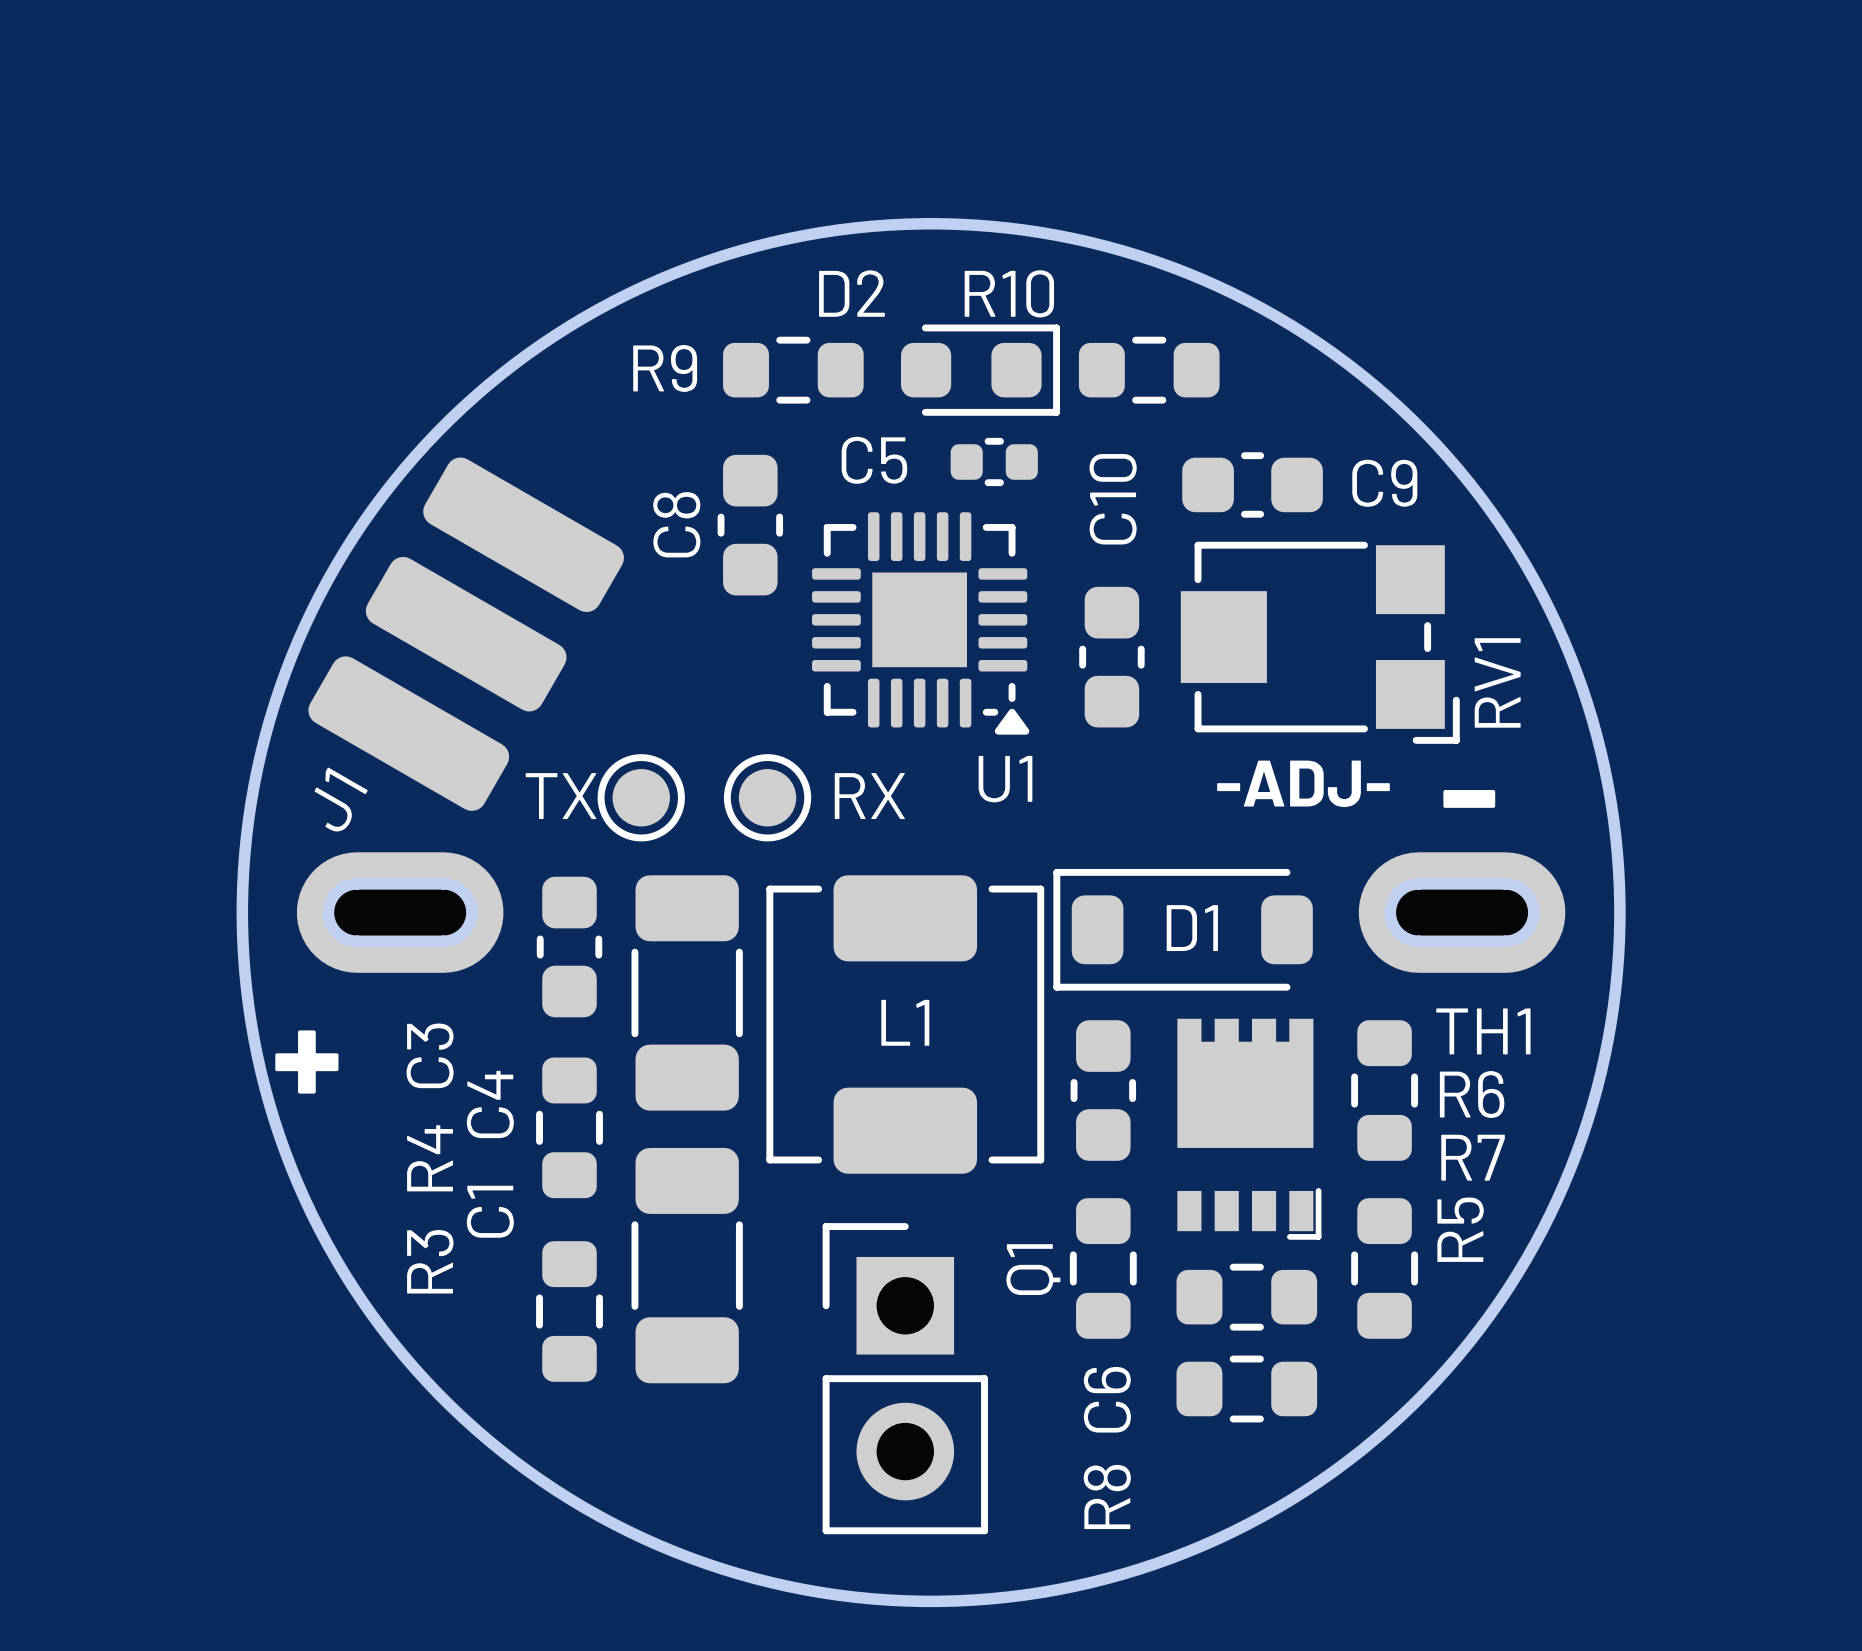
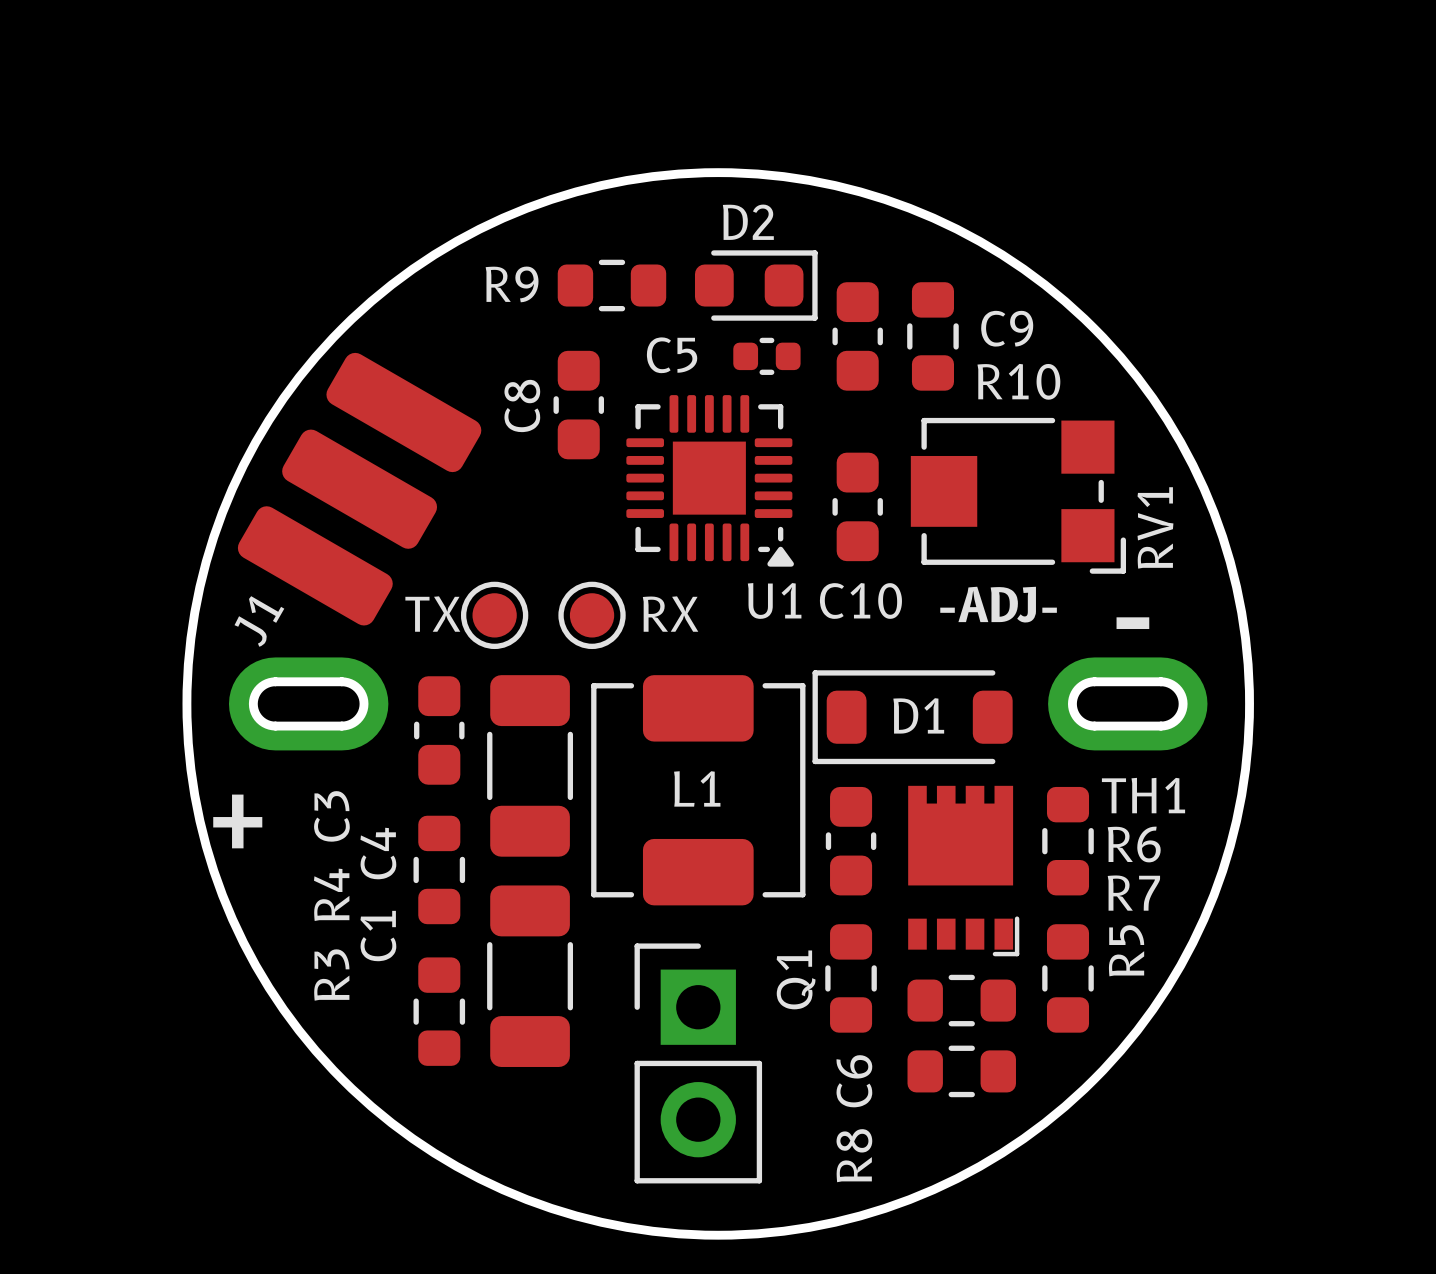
D2 name position: D2 (851, 293) -> D2 (748, 222)
R10 name position: R10 (1009, 293) -> R10 (1018, 381)
R10 rotation: 0° (1149, 370) -> 90° clockwise (932, 336)
R10 position: (1149, 370) -> (932, 336)
C9 rotation: 0° (1252, 484) -> 90° clockwise (857, 336)
C9 position: (1252, 484) -> (857, 336)
C10 name rotation: 0° (1113, 499) -> 90° clockwise (860, 600)
C10 name position: C10 (1113, 499) -> C10 (860, 600)

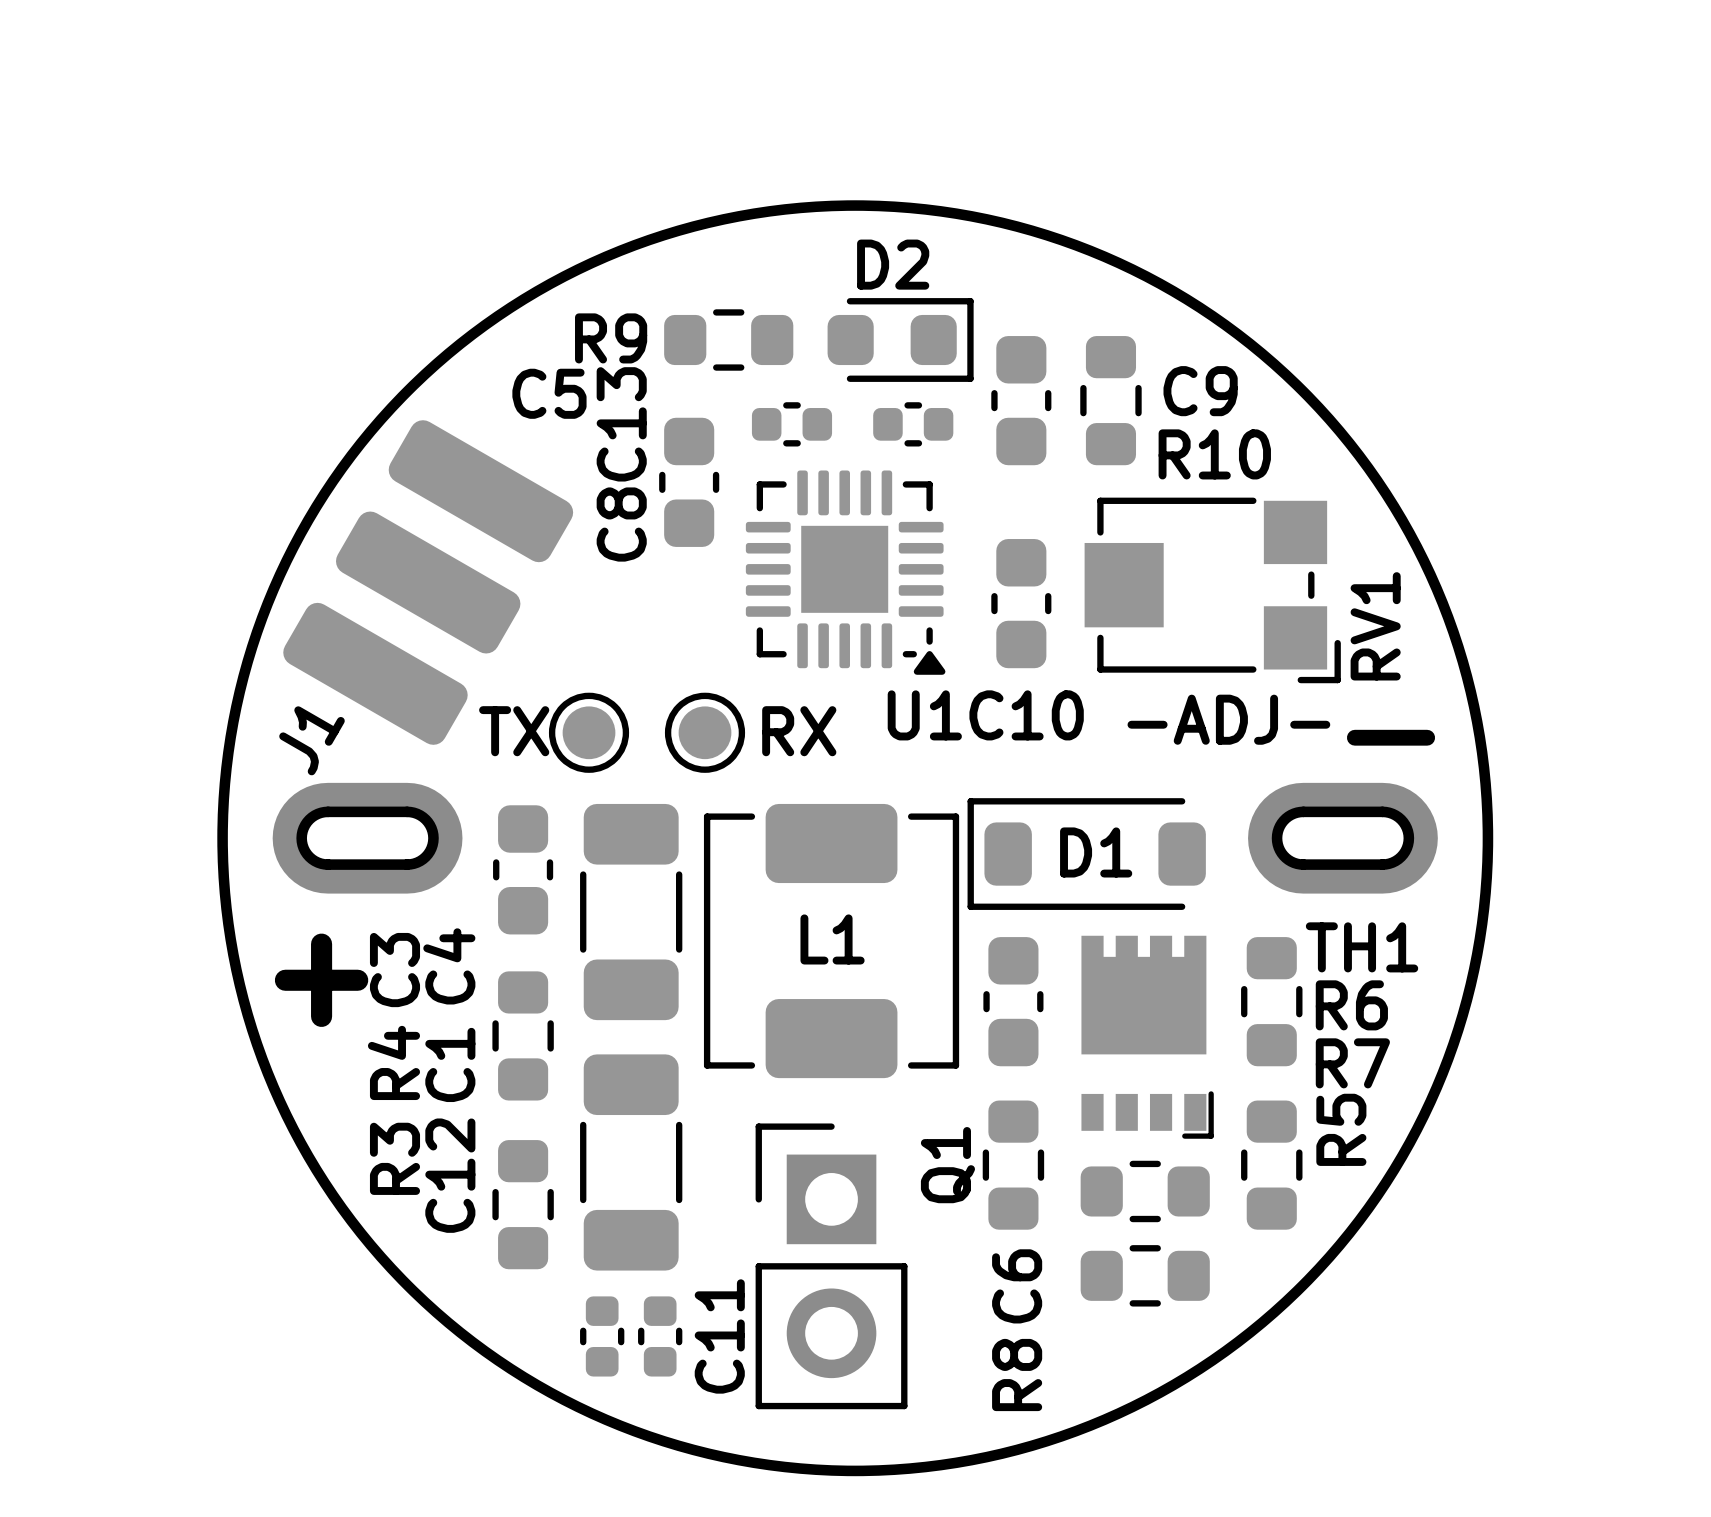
C5 name position: C5 (672, 355) -> C5 (549, 393)
C13: none -> (791, 424)
C8 name position: C8 (522, 405) -> C8 (621, 524)
C4 name position: C4 (378, 853) -> C4 (449, 966)
C1 name position: C1 (378, 936) -> C1 (450, 1064)
C12: none -> (602, 1336)
C11: none -> (660, 1336)

